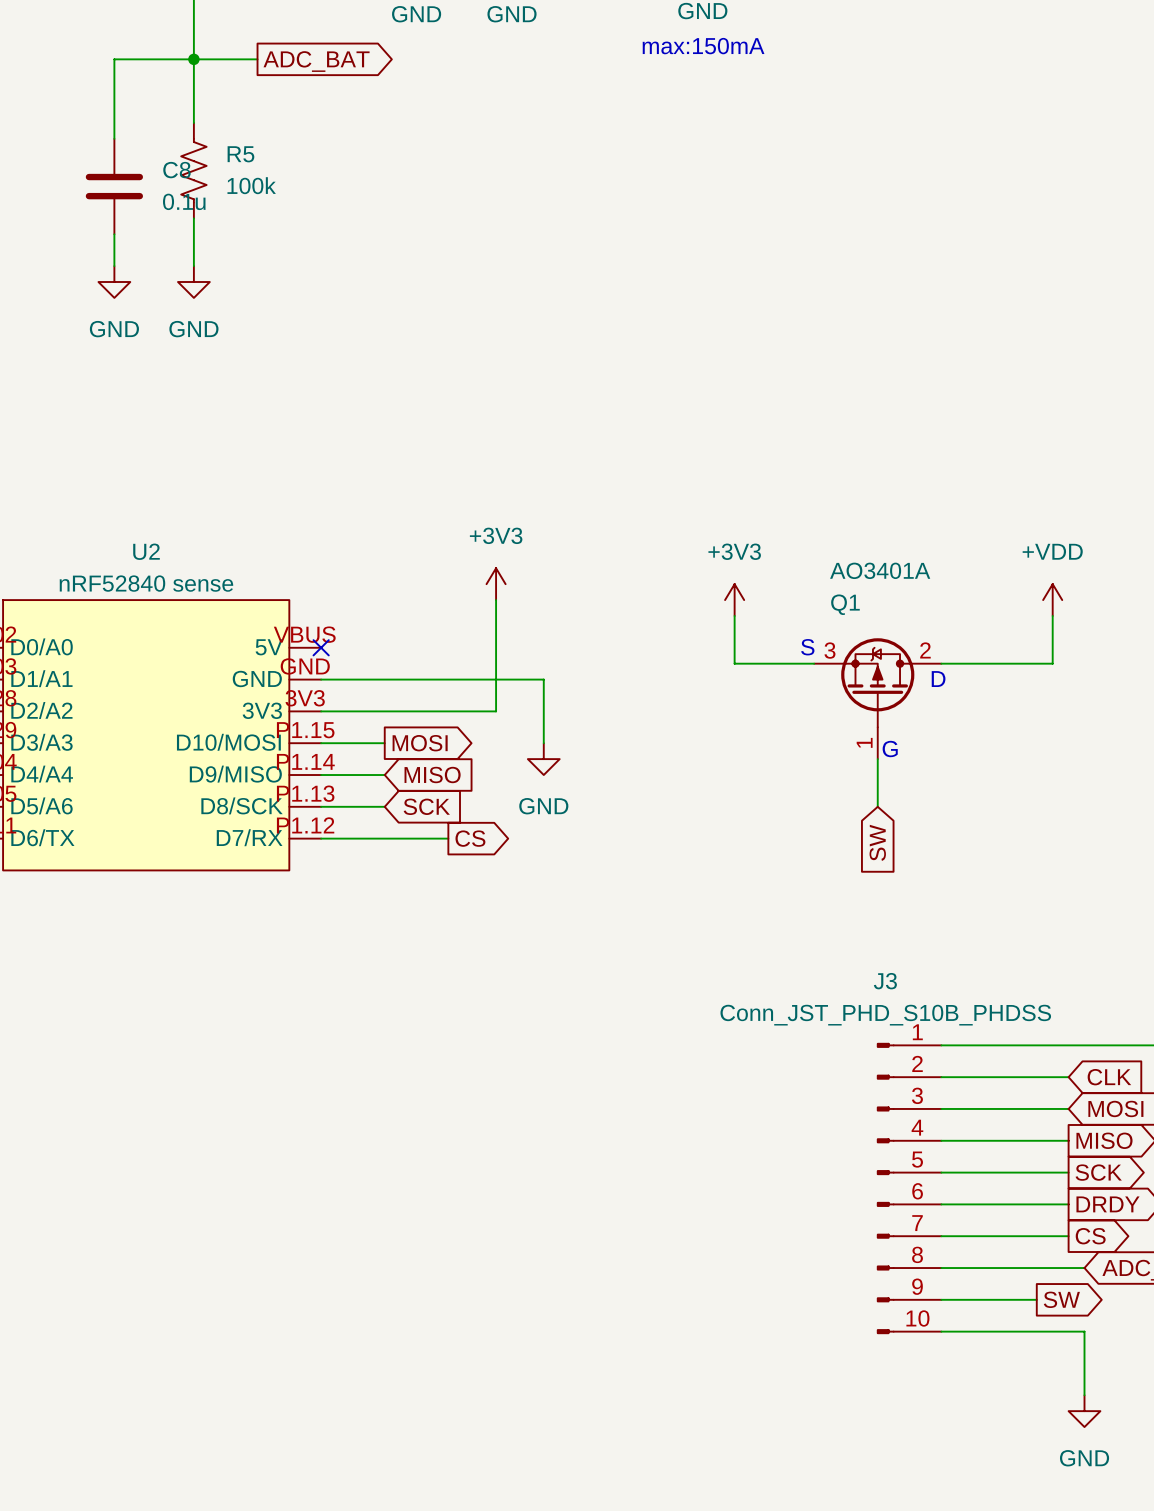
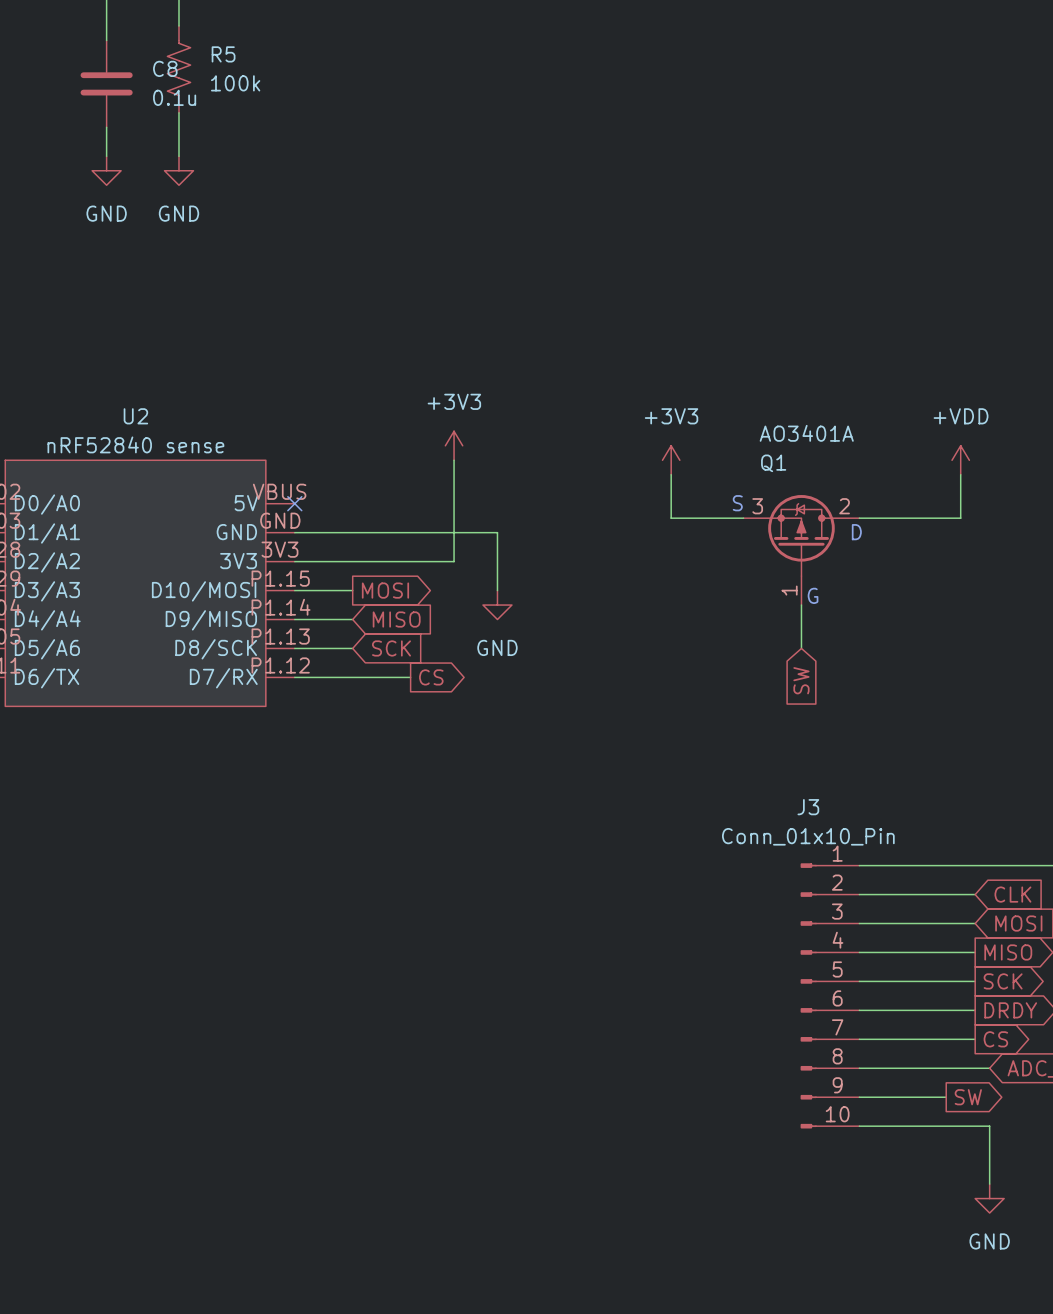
J3 value: Conn_JST_PHD_S10B_PHDSS (885, 1015) -> Conn_01x10_Pin (808, 836)

